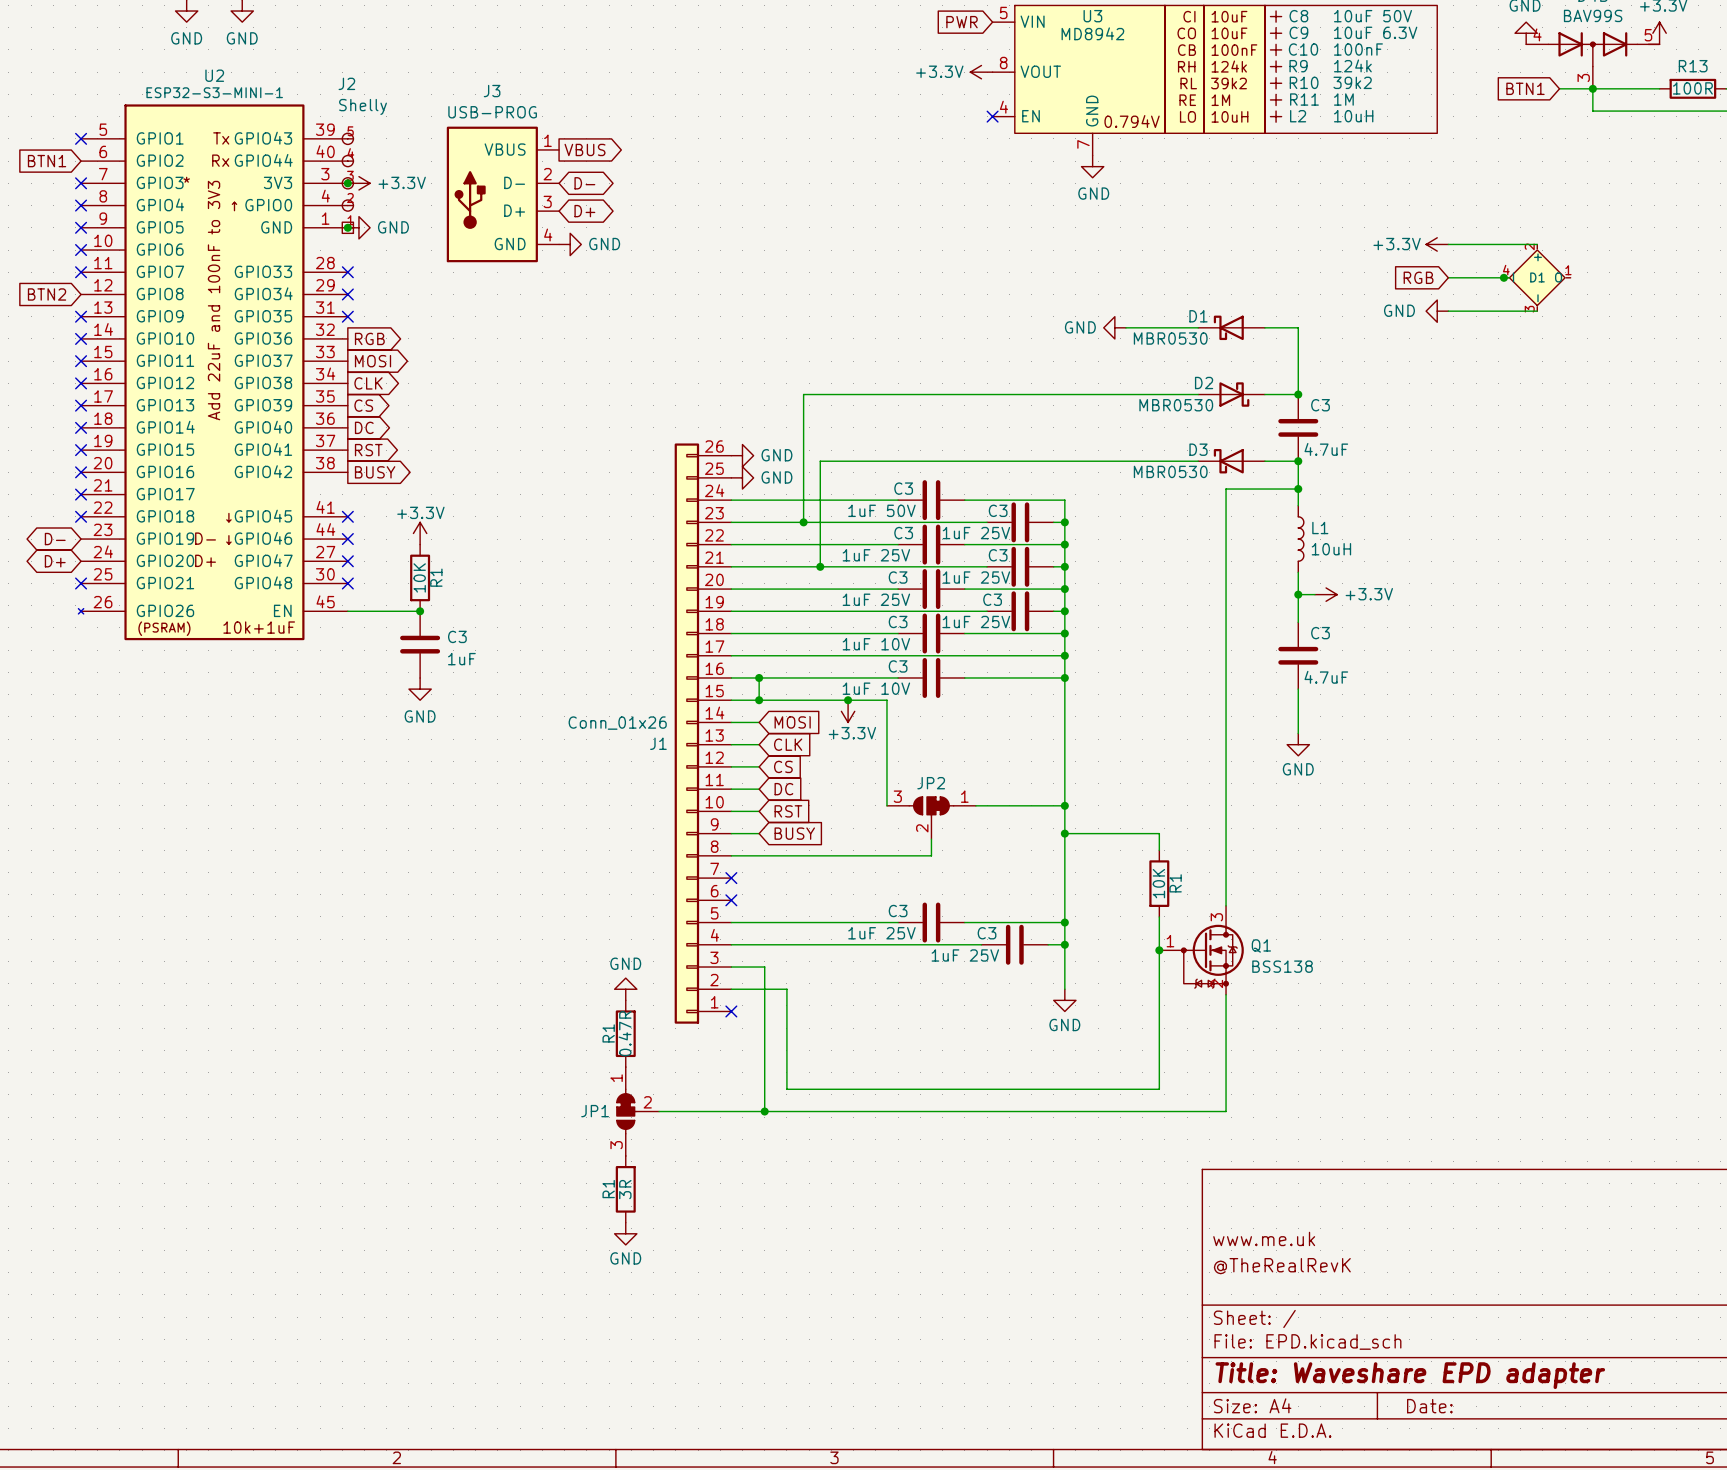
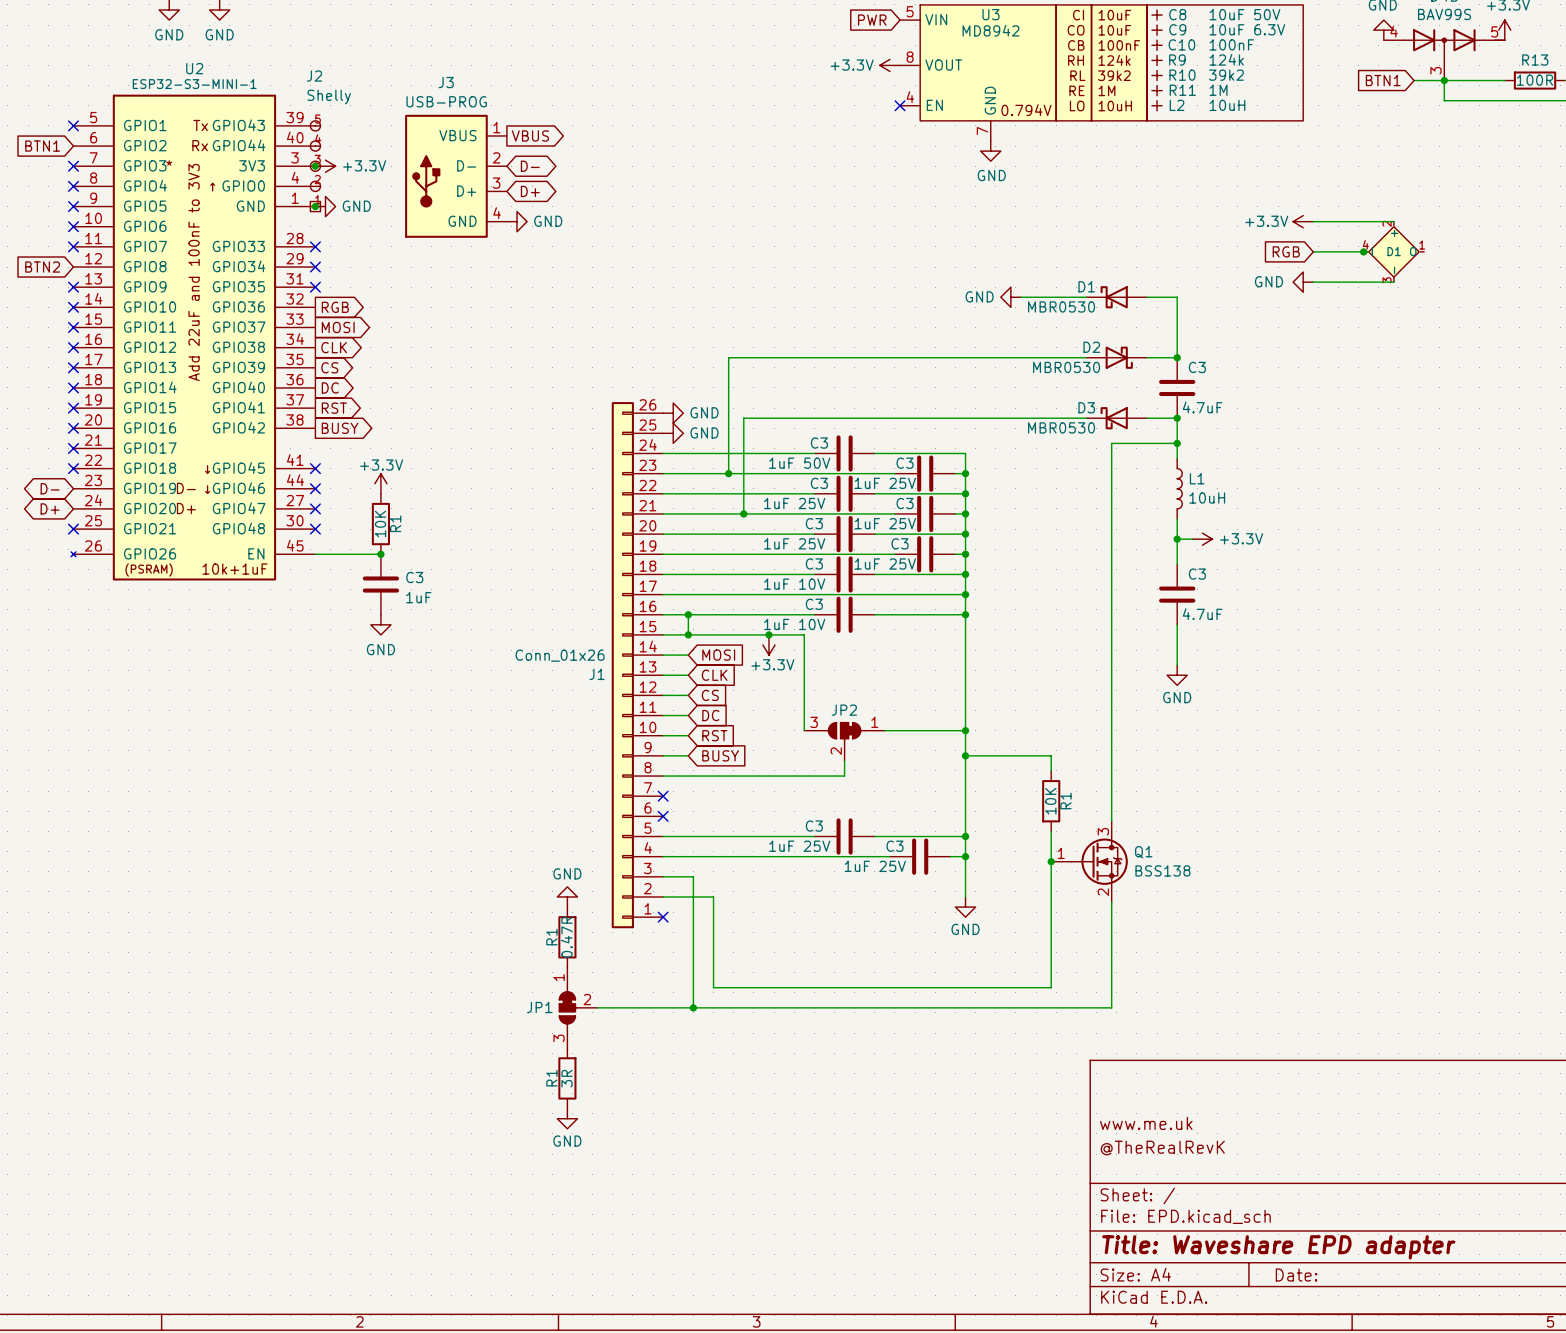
Q1 symbol: [1159, 905, 1244, 995] -> [1051, 821, 1128, 903]

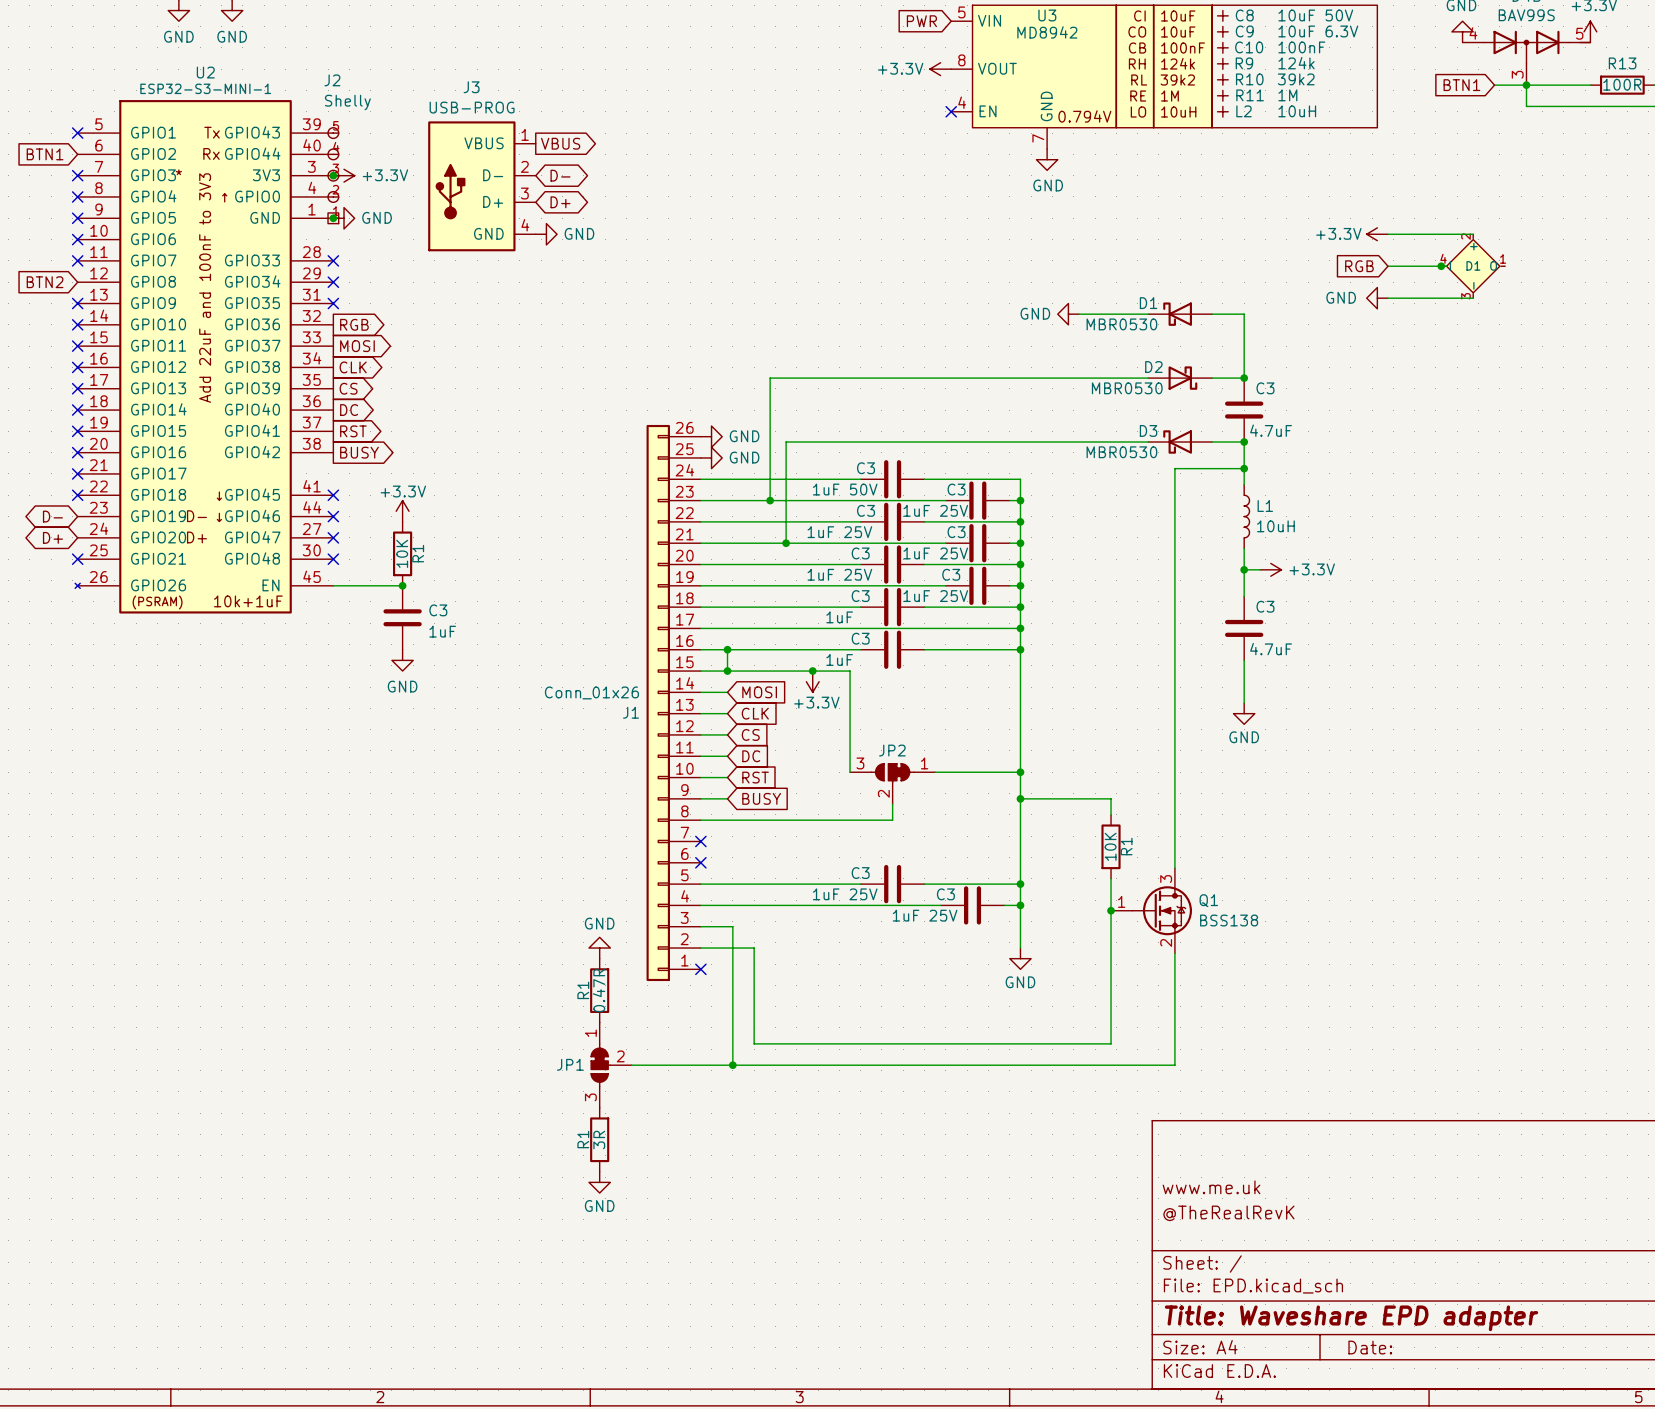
C3 value: 1uF 10V (794, 584) -> 1uF (839, 617)
C3 value: 1uF 10V (794, 624) -> 1uF (839, 659)

